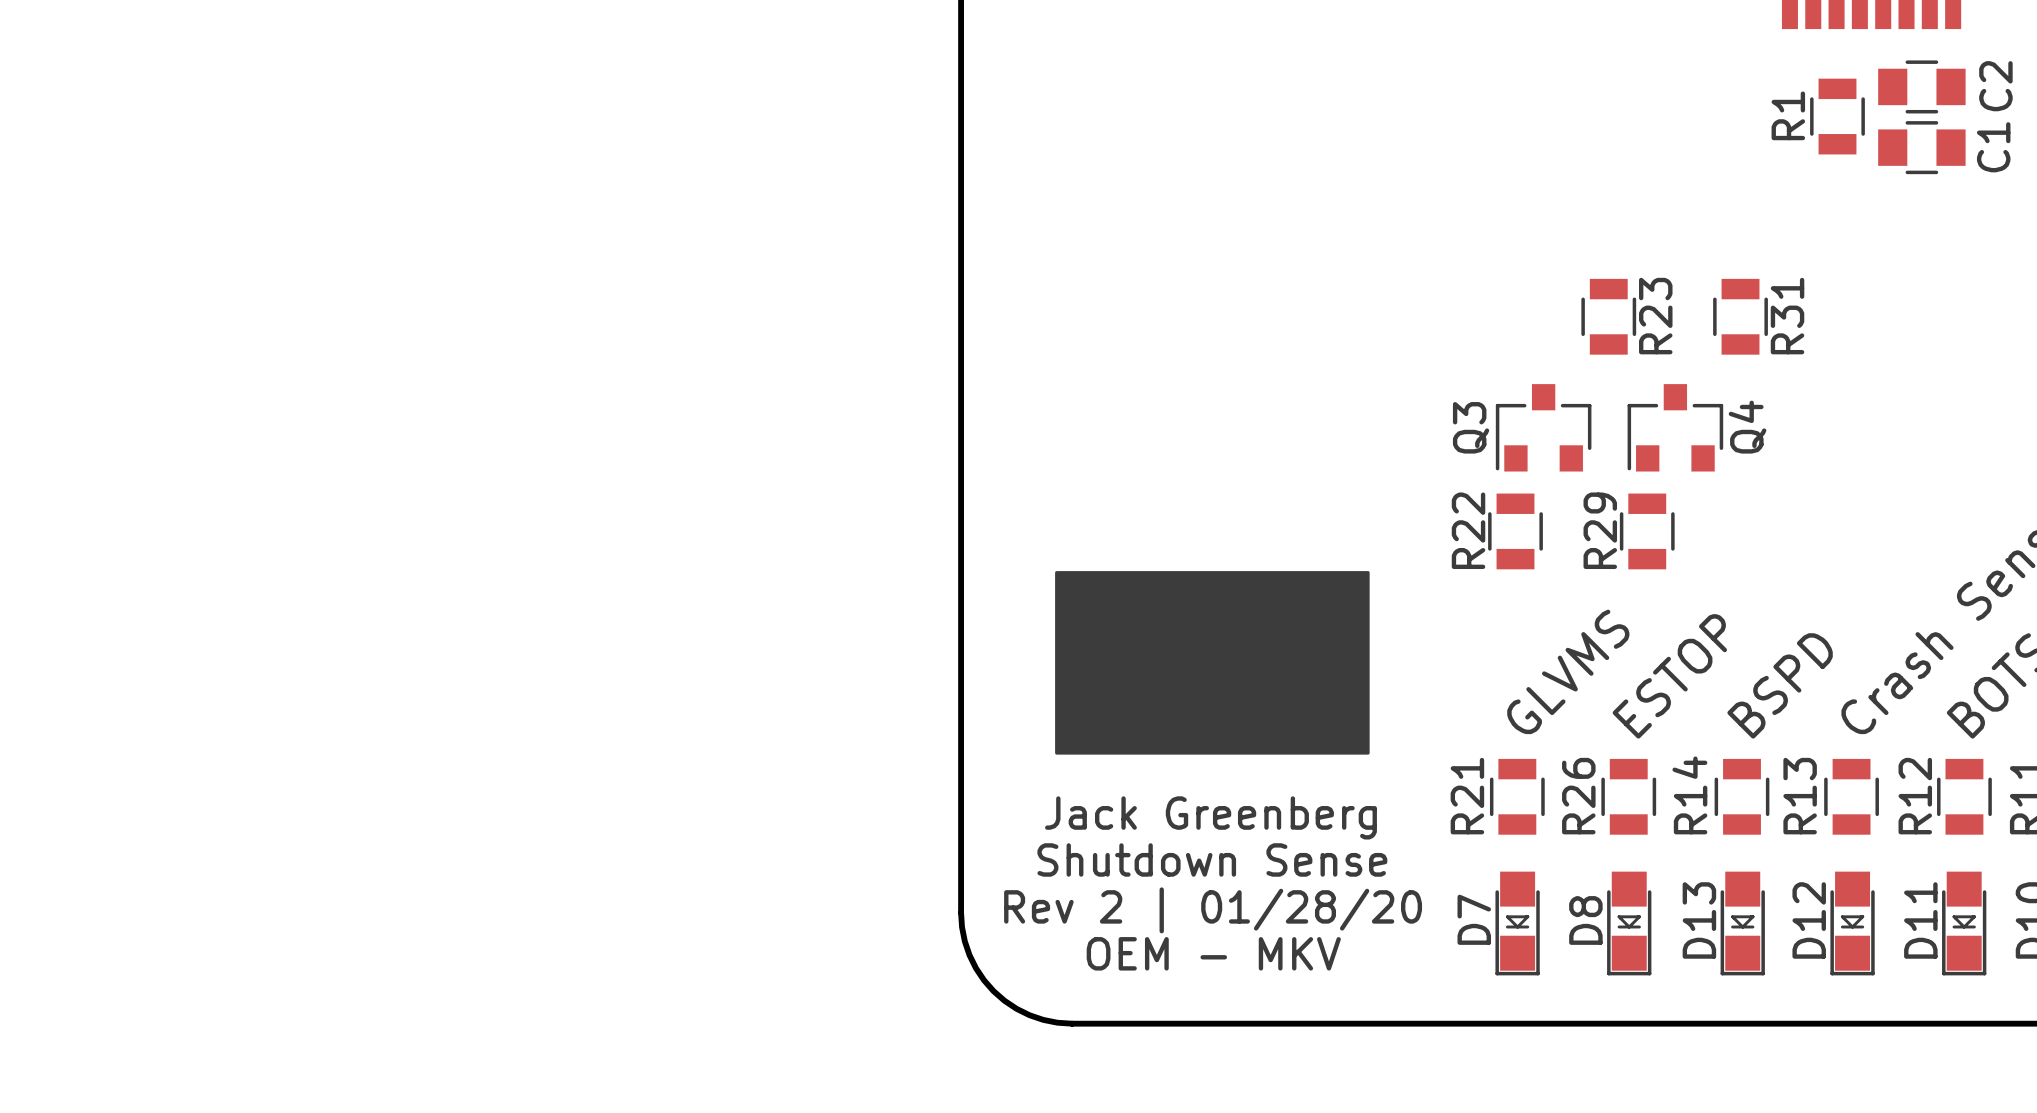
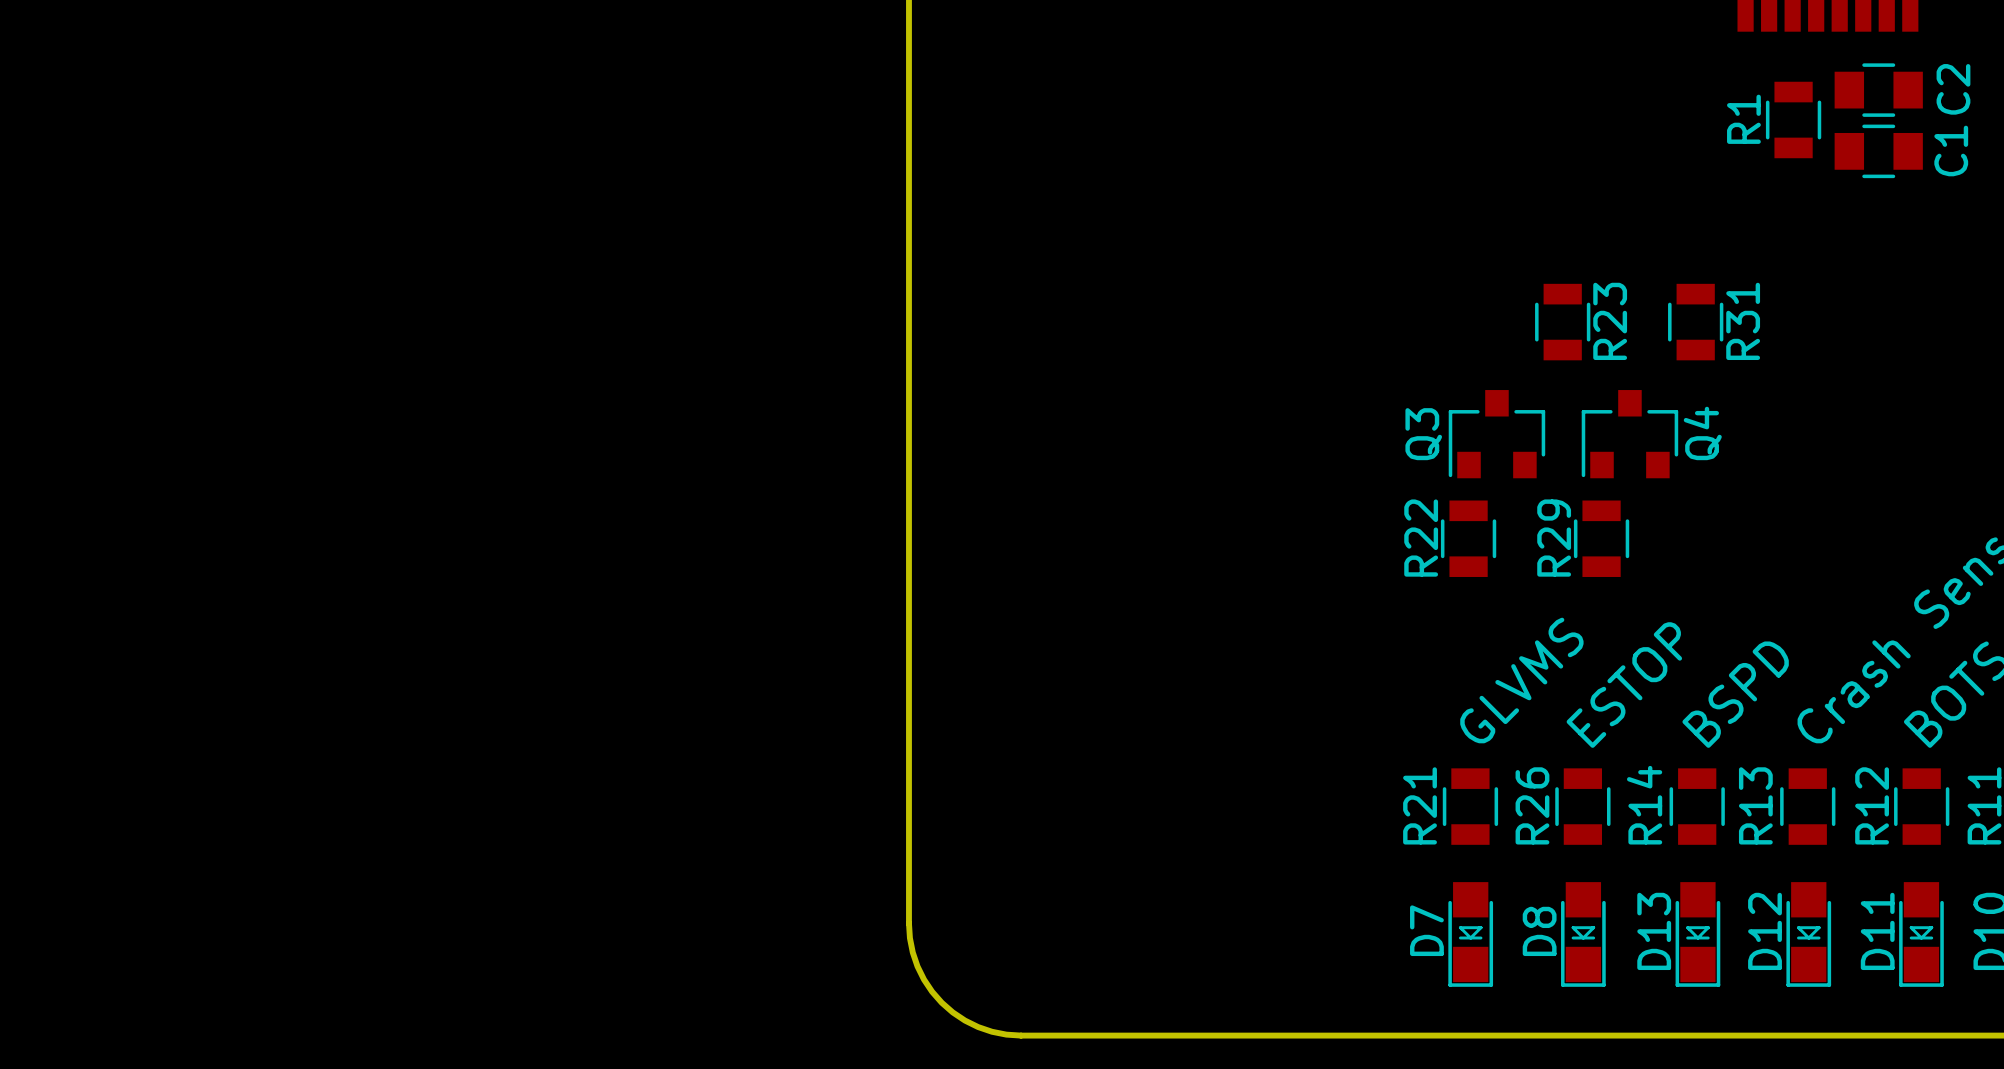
drawing: [1055, 571, 1370, 755] -> none
text: Jack Greenberg (1210, 817) -> none
text: Shutdown Sense (1212, 859) -> none
text: Rev 2 | 01/28/20 (1213, 910) -> none
text: OEM - MKV (1213, 953) -> none

